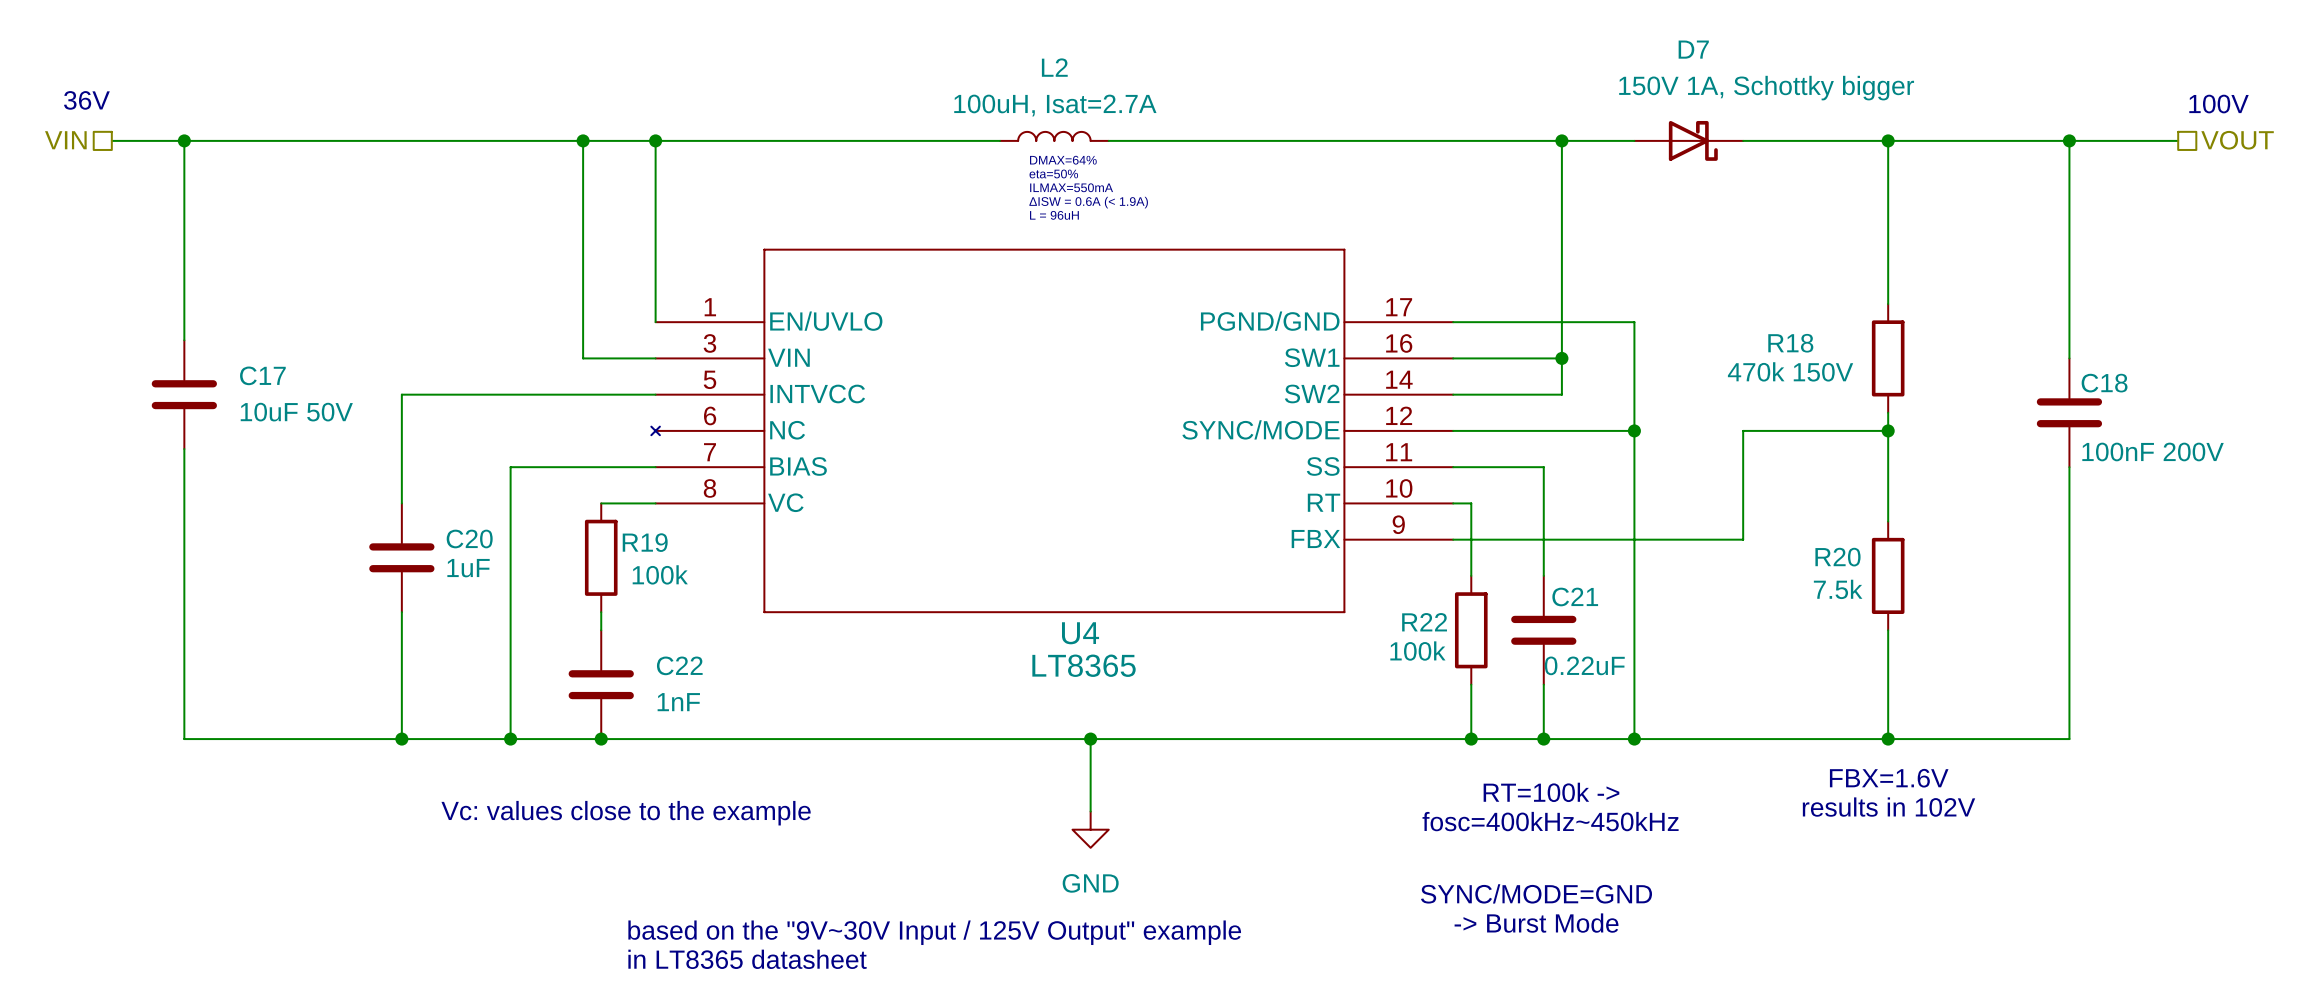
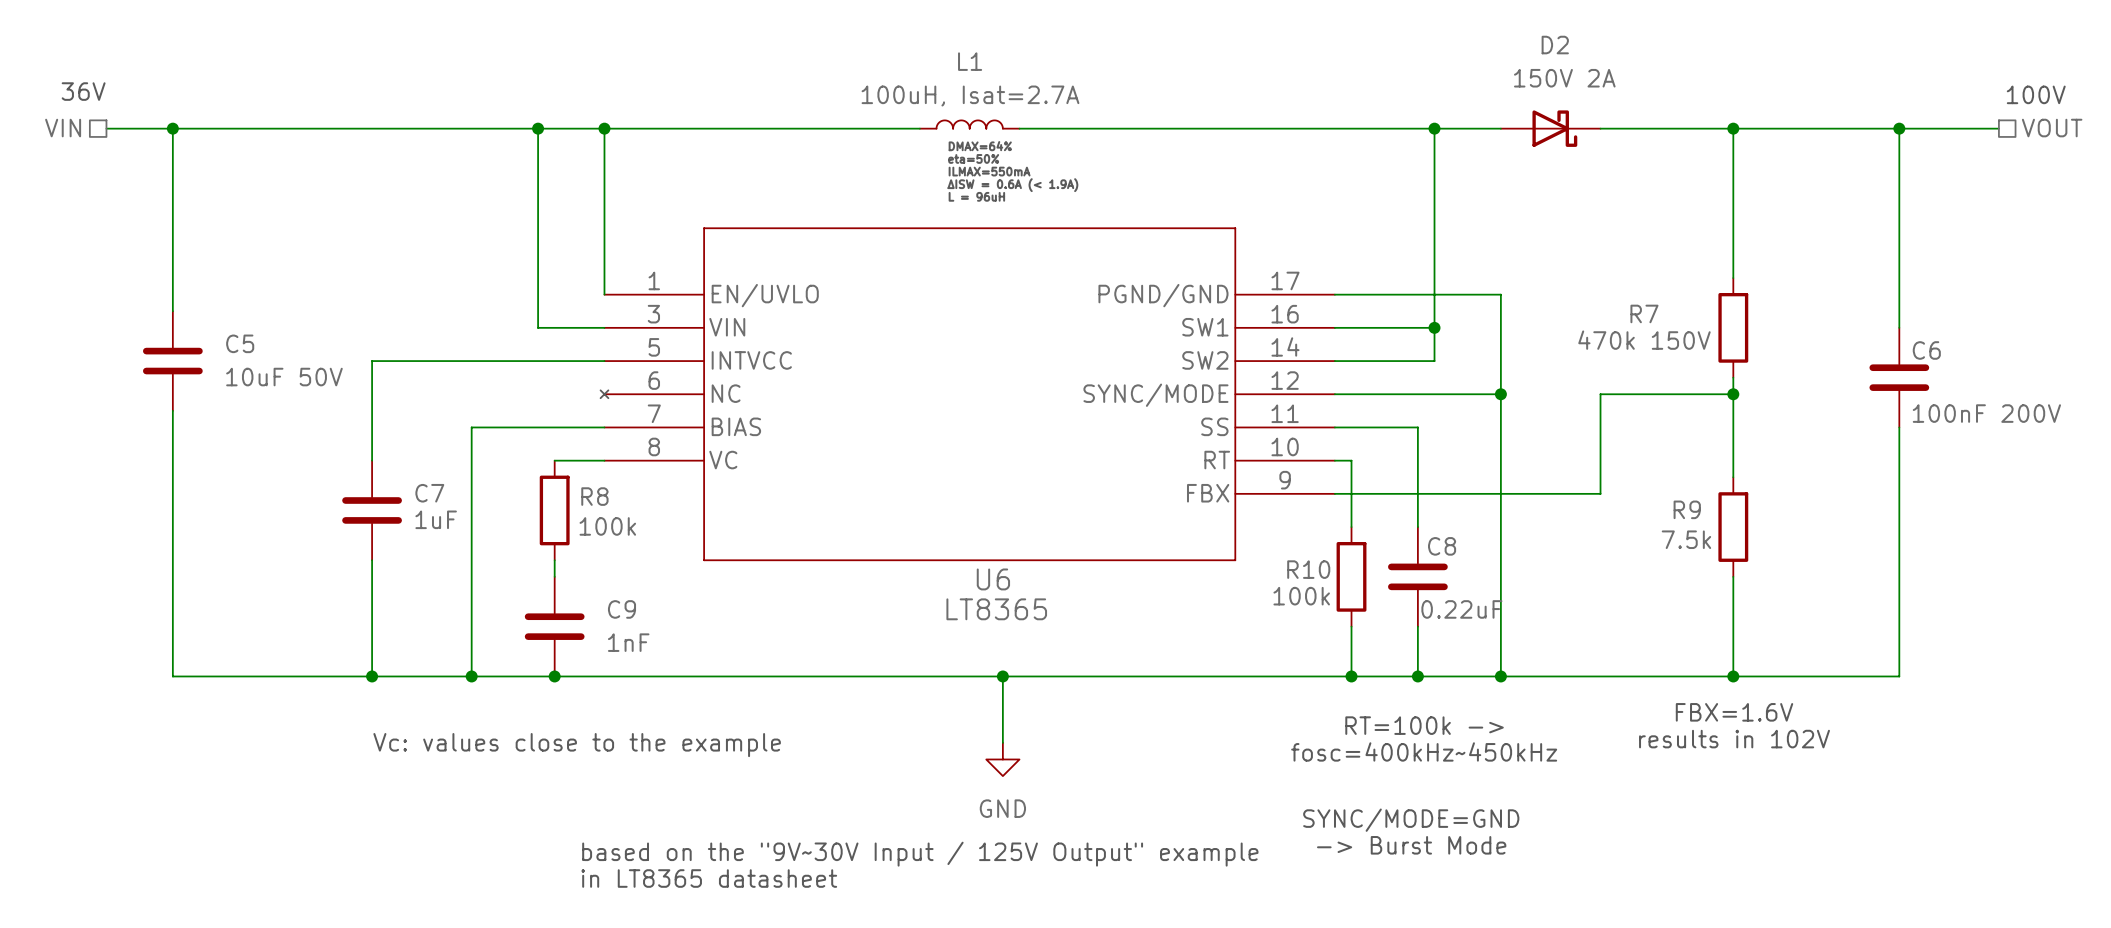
D7 name: D7 (1693, 49) -> D2 (1555, 45)
L2 name: L2 (1054, 67) -> L1 (970, 61)
D7 value: 150V 1A, Schottky bigger (1766, 88) -> 150V 2A (1564, 78)
R18 name: R18 (1790, 343) -> R7 (1644, 313)
C17 name: C17 (262, 375) -> C5 (240, 343)
C18 name: C18 (2104, 383) -> C6 (1926, 350)
C20 name: C20 (469, 538) -> C7 (429, 493)
R19 name: R19 (645, 542) -> R8 (594, 496)
R20 name: R20 (1837, 557) -> R9 (1687, 509)
C21 name: C21 (1575, 596) -> C8 (1442, 546)
R22 name: R22 (1424, 622) -> R10 (1308, 569)
U4 name: U4 (1080, 633) -> U6 (993, 579)
C22 name: C22 (679, 665) -> C9 (621, 609)

